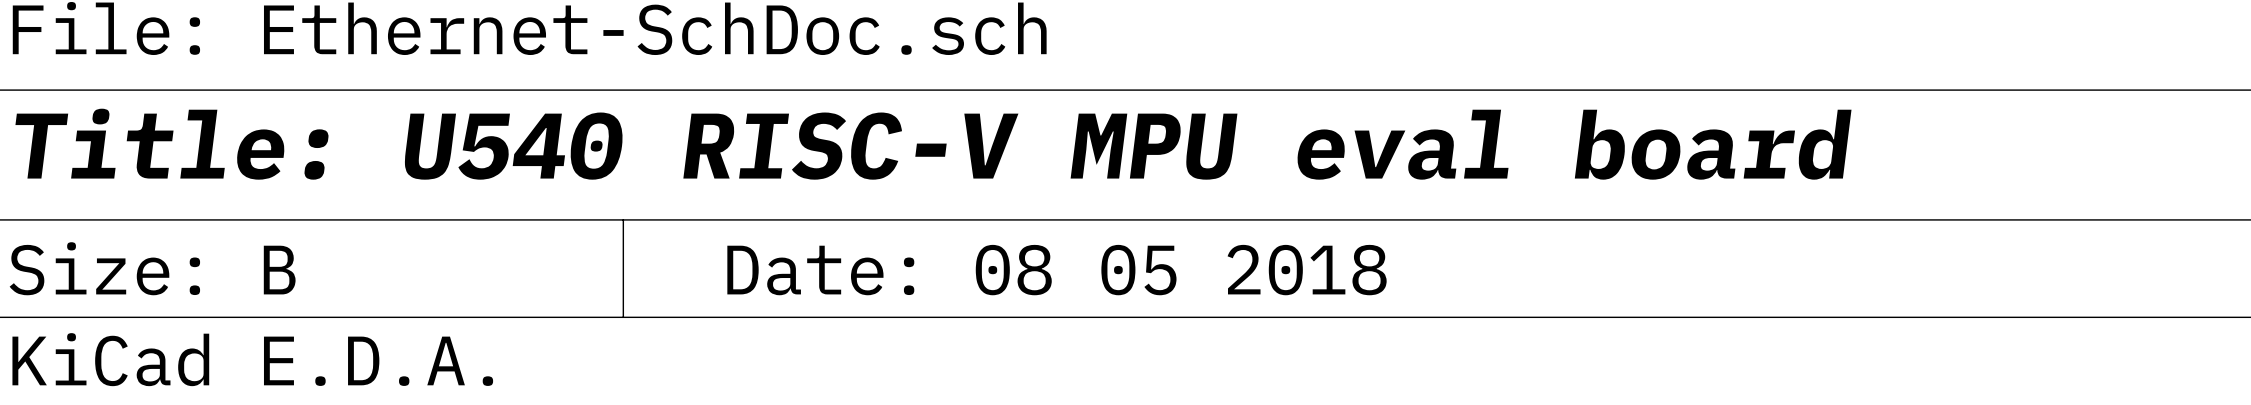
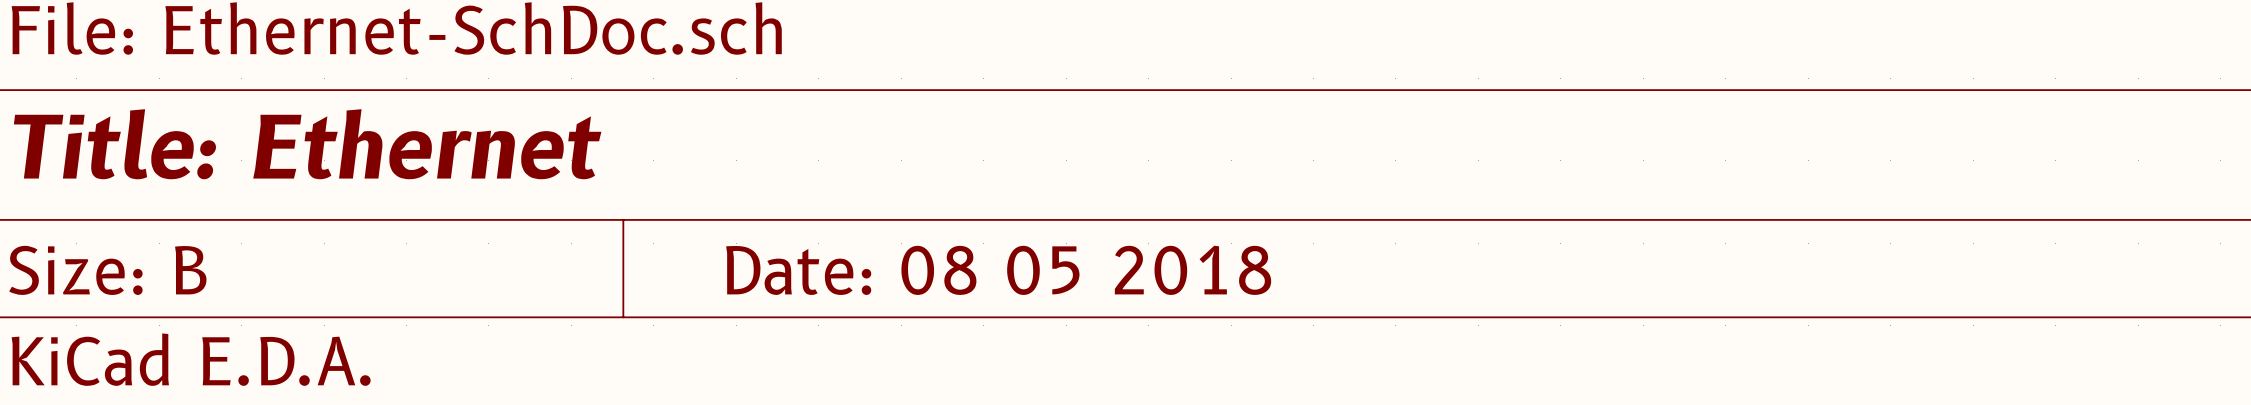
title block: Title: U540 RISC-V MPU eval board (933, 144) -> Title: Ethernet (307, 144)

